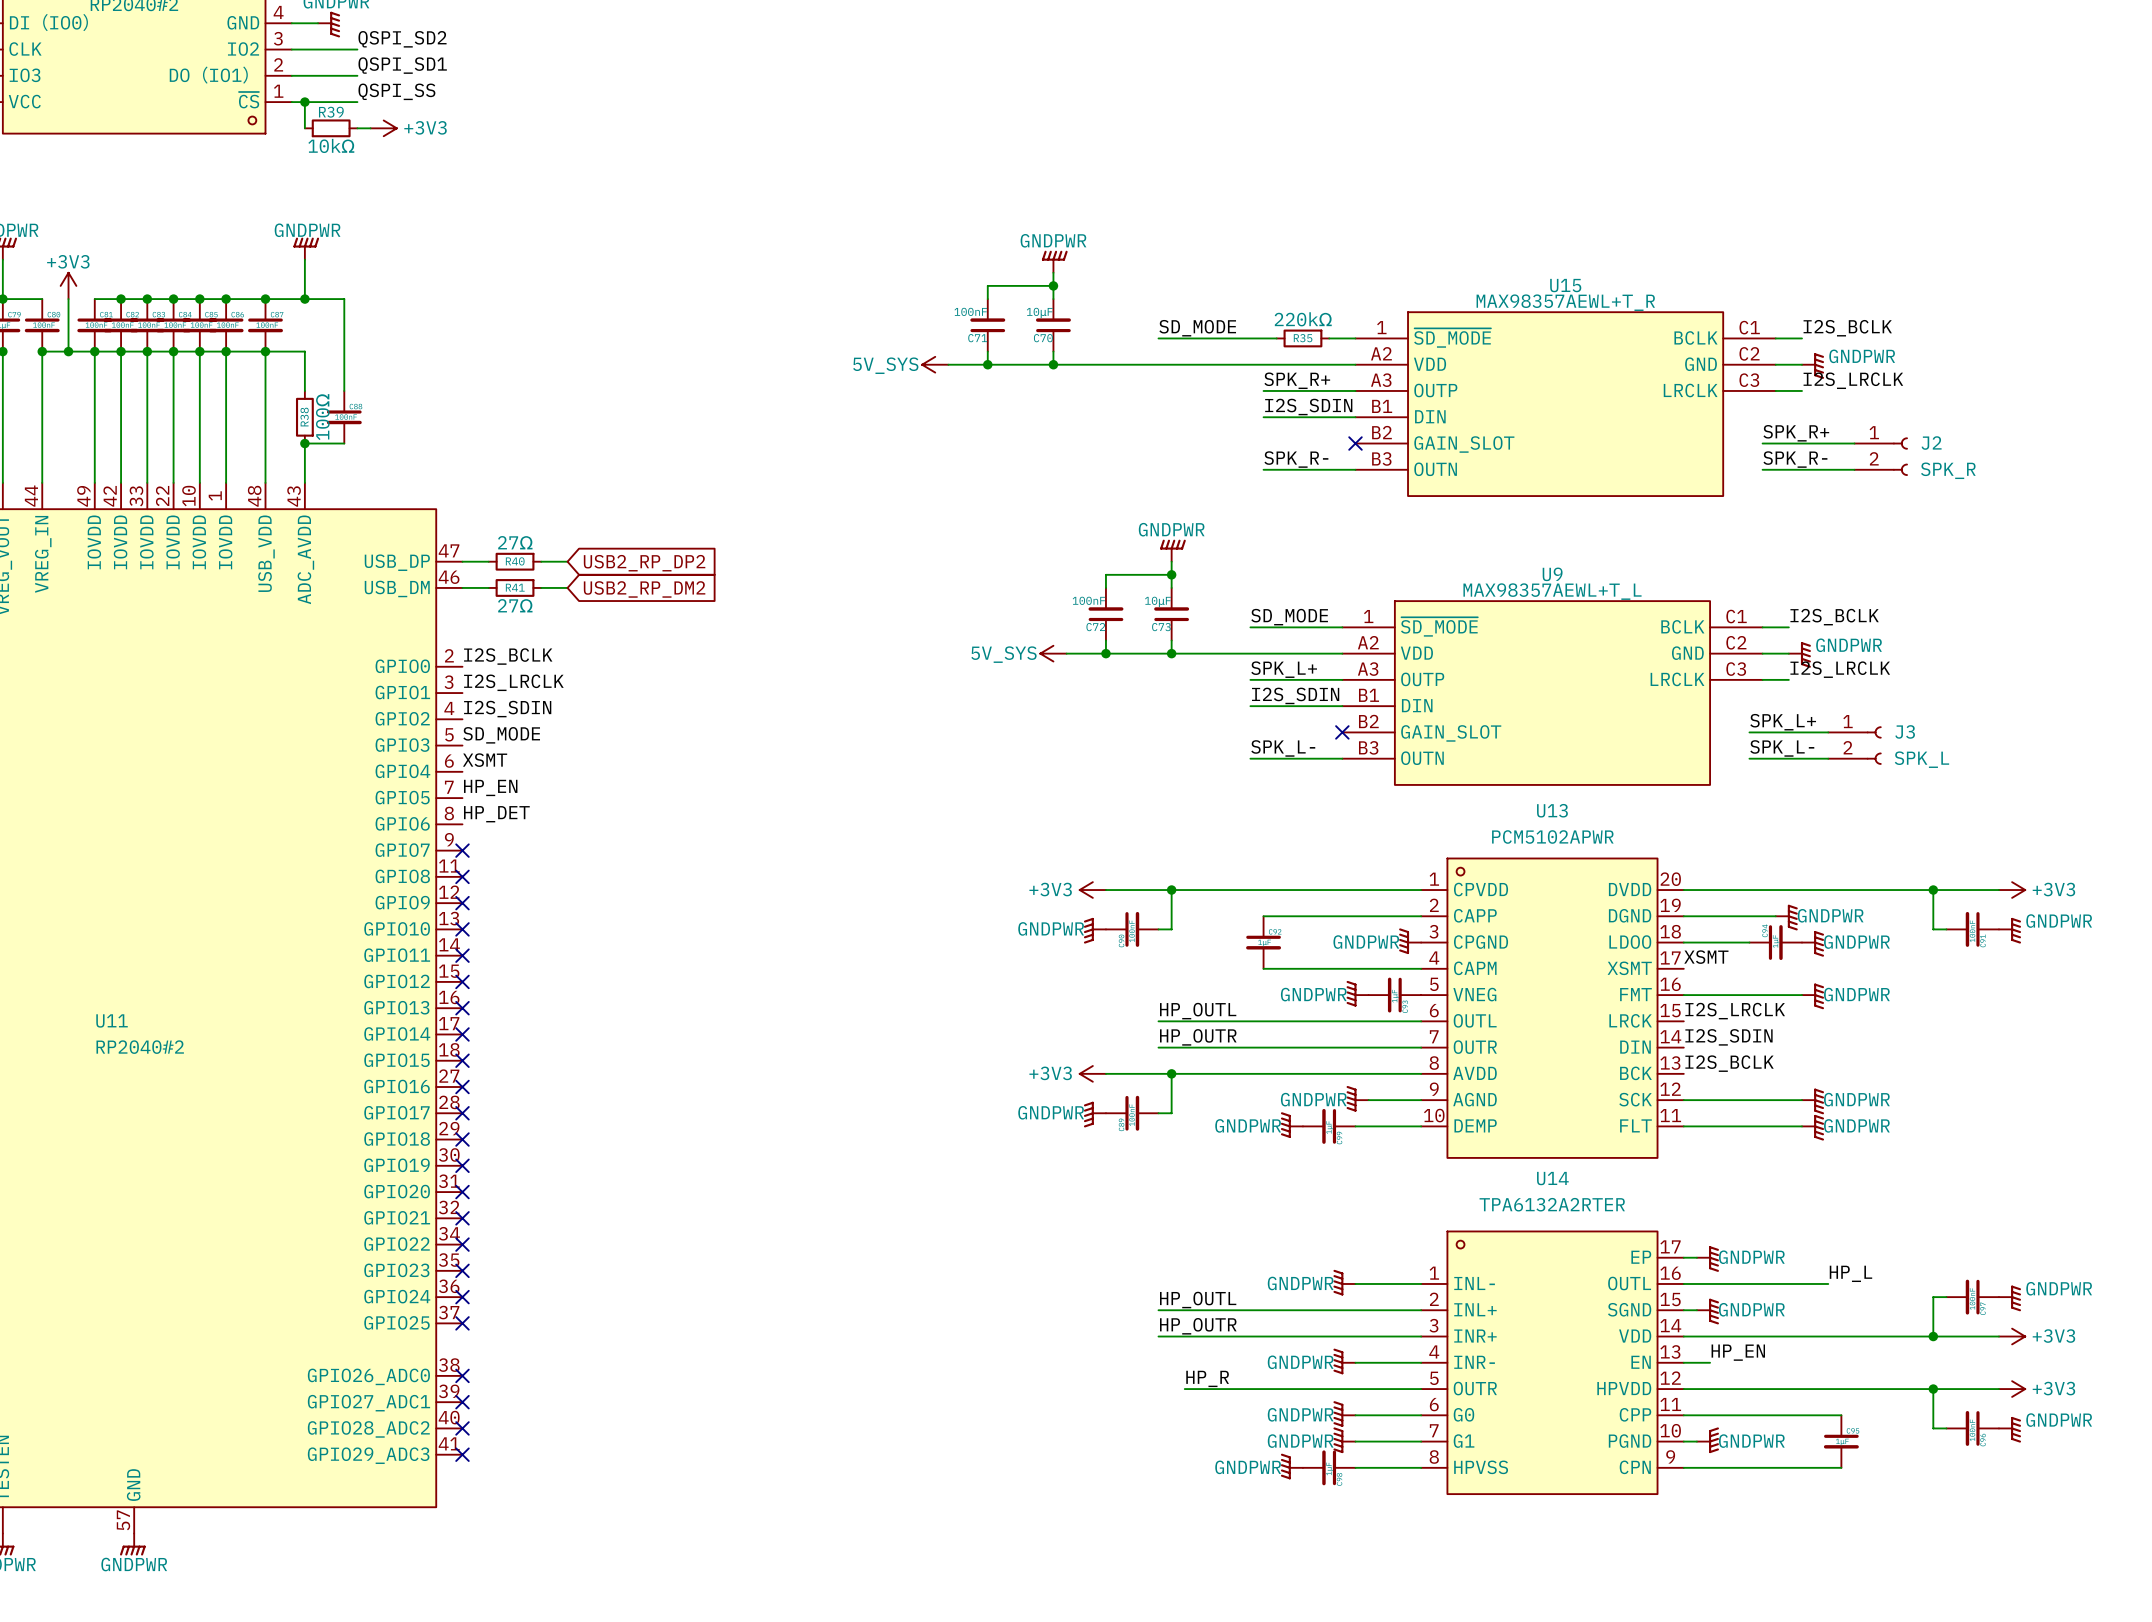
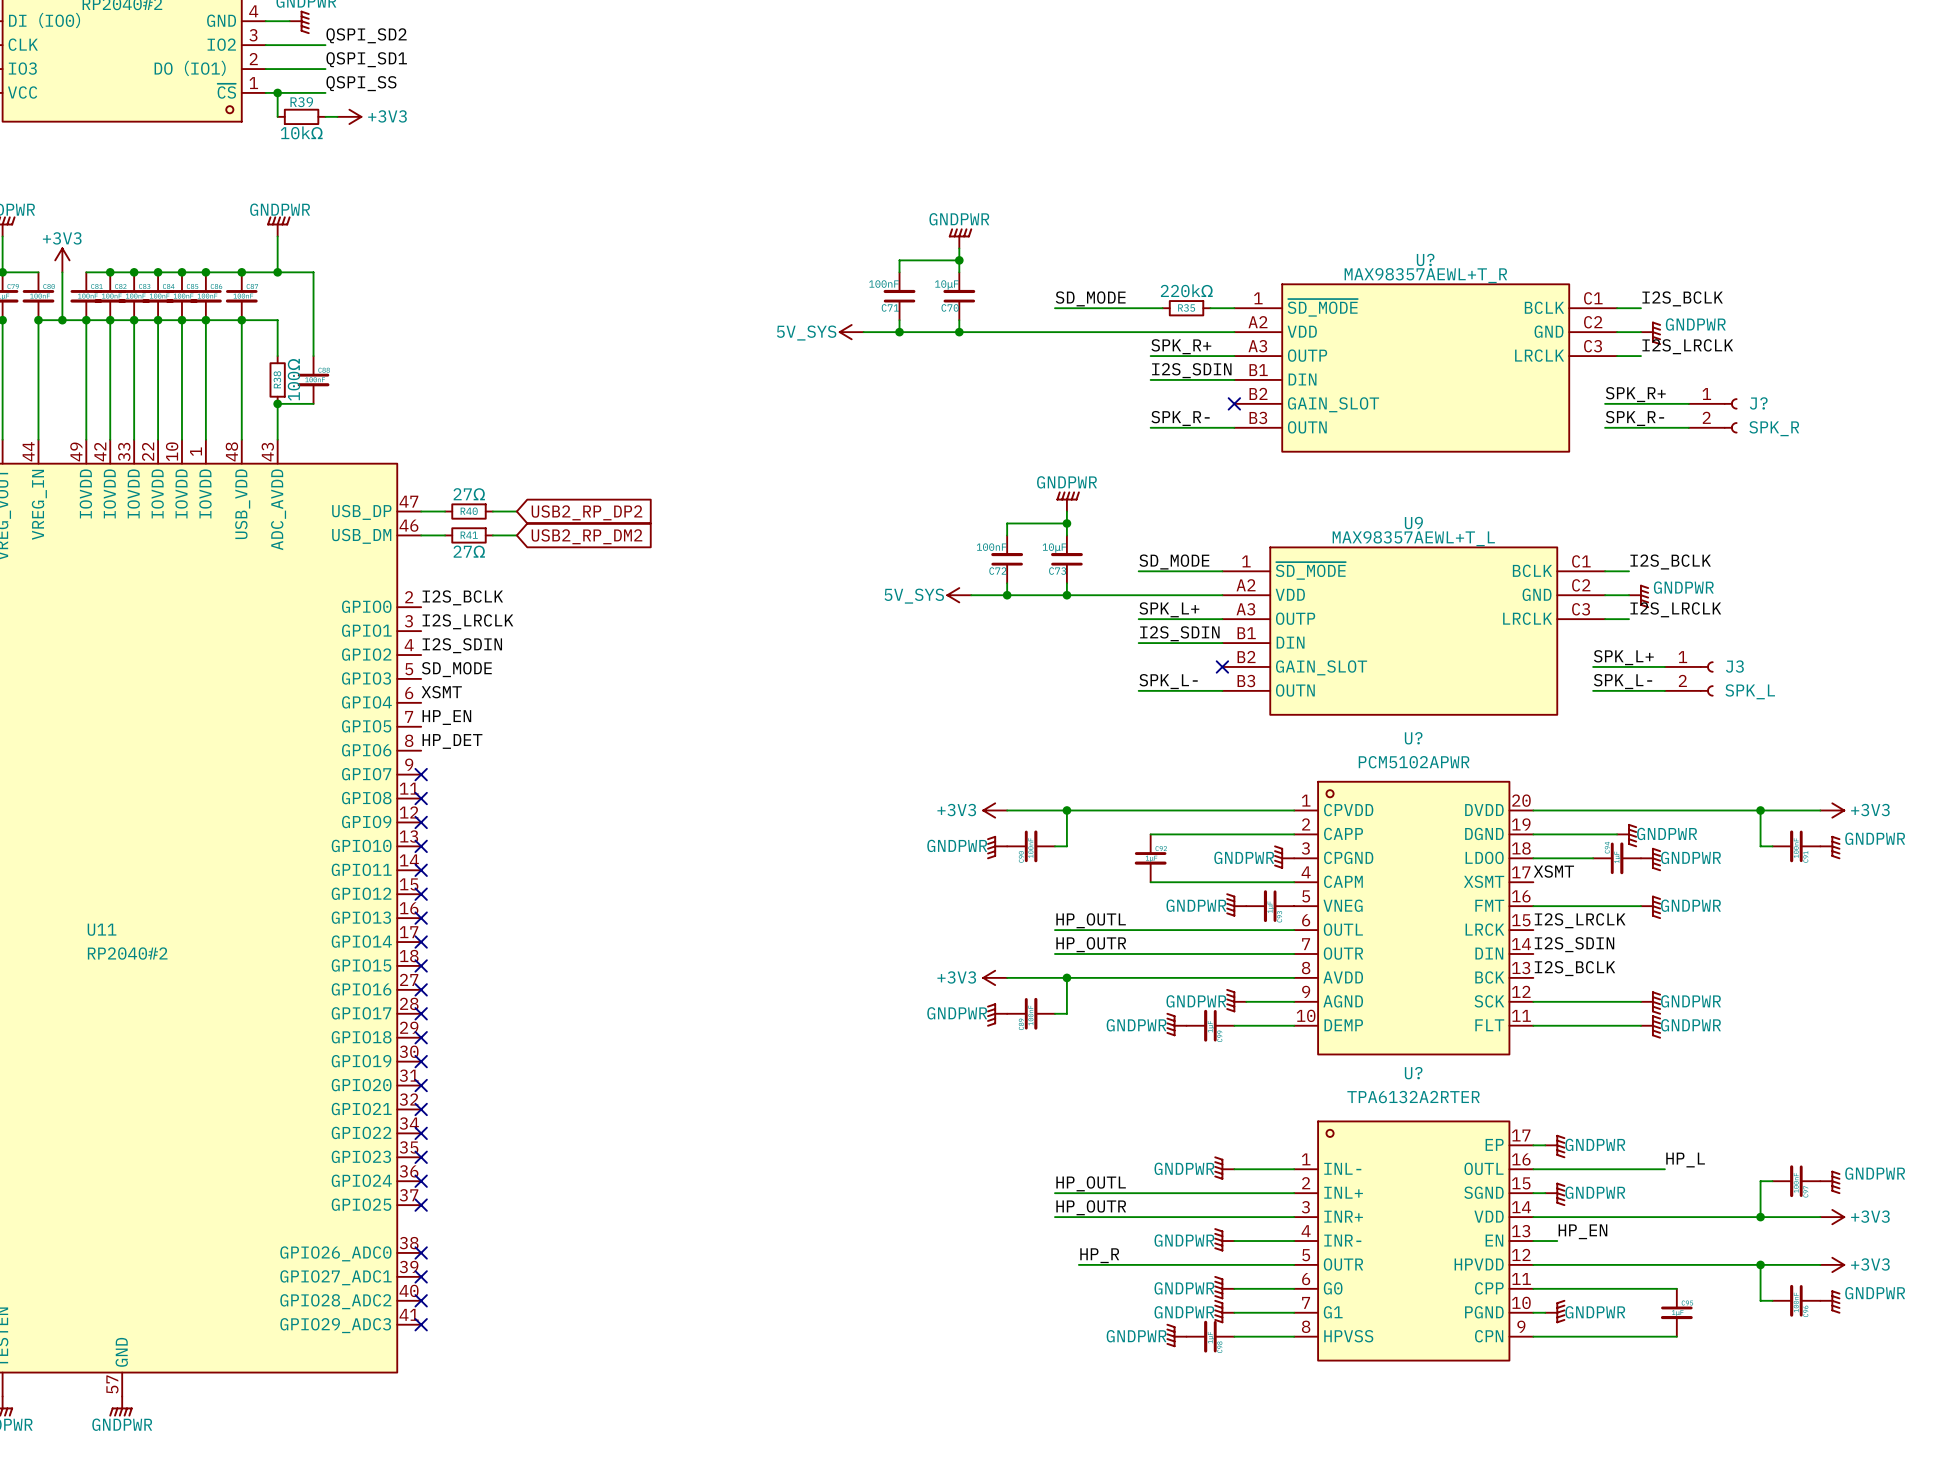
U15 name: U15 (1565, 285) -> U? (1425, 259)
J2 name: J2 (1931, 443) -> J? (1758, 403)
U13 name: U13 (1552, 810) -> U? (1413, 738)
U14 name: U14 (1552, 1178) -> U? (1413, 1073)

